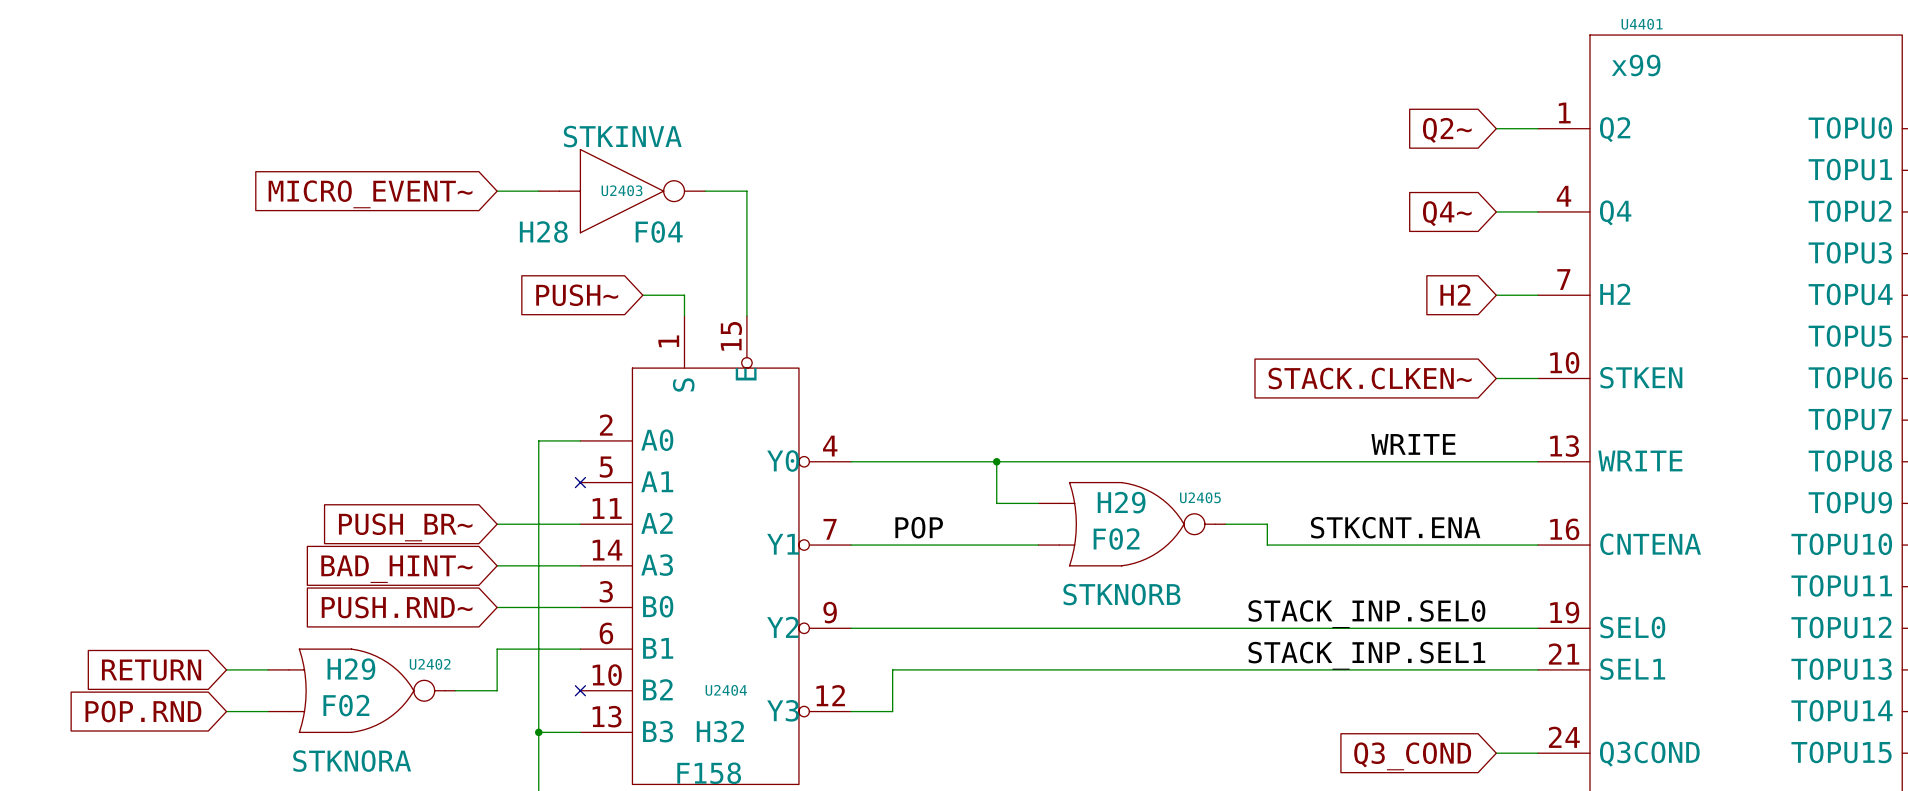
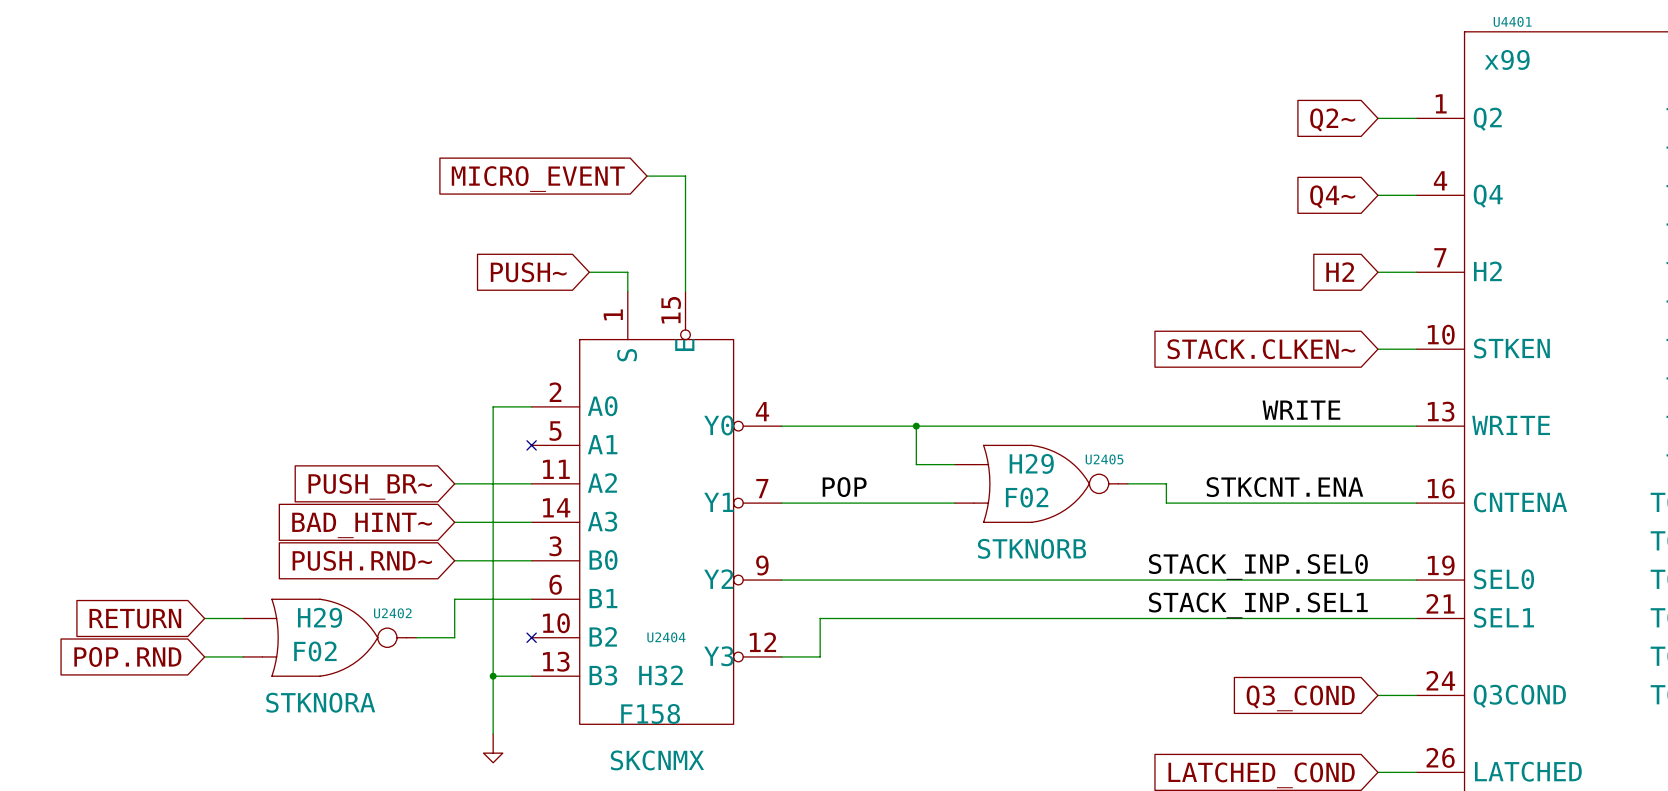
wire: (497, 191) (538, 191) -> none
U2403: F04 (622, 191) -> none
global label: MICRO_EVENT~ (370, 194) -> none
global label: none -> MICRO_EVENT (538, 179)

